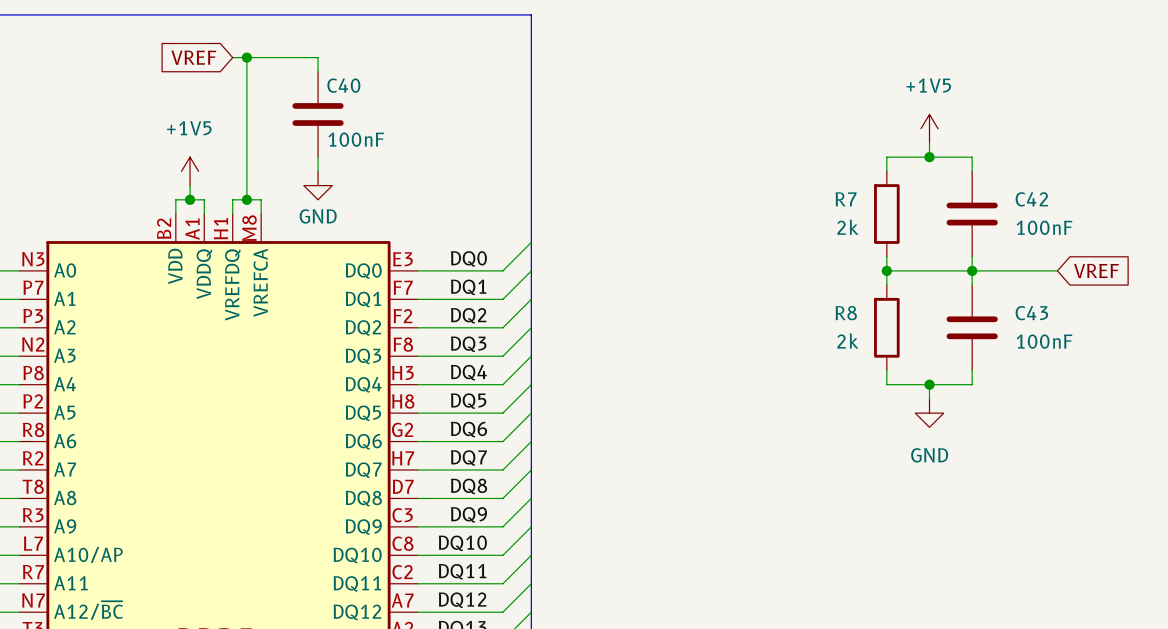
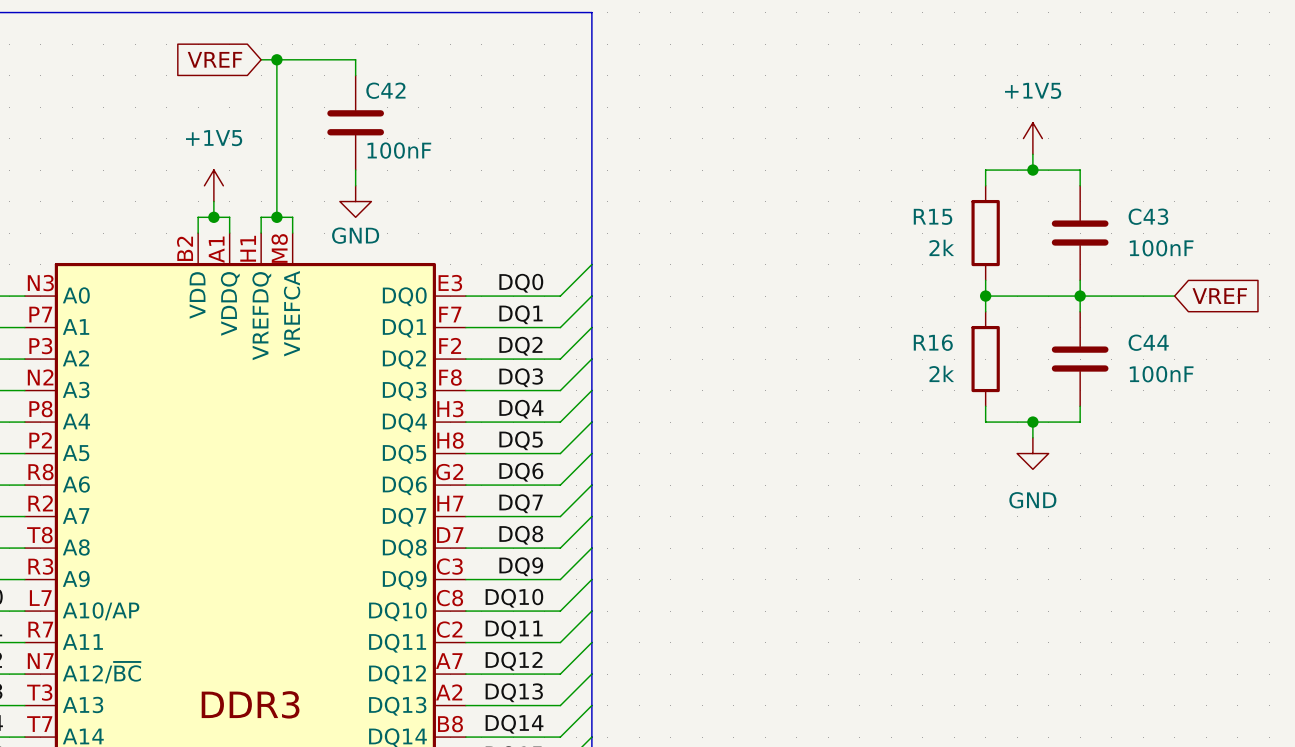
C40 name: C40 (343, 85) -> C42 (385, 90)
R7 name: R7 (846, 199) -> R15 (933, 216)
C42 name: C42 (1031, 199) -> C43 (1148, 216)
R8 name: R8 (846, 313) -> R16 (933, 342)
C43 name: C43 (1031, 313) -> C44 (1148, 342)

